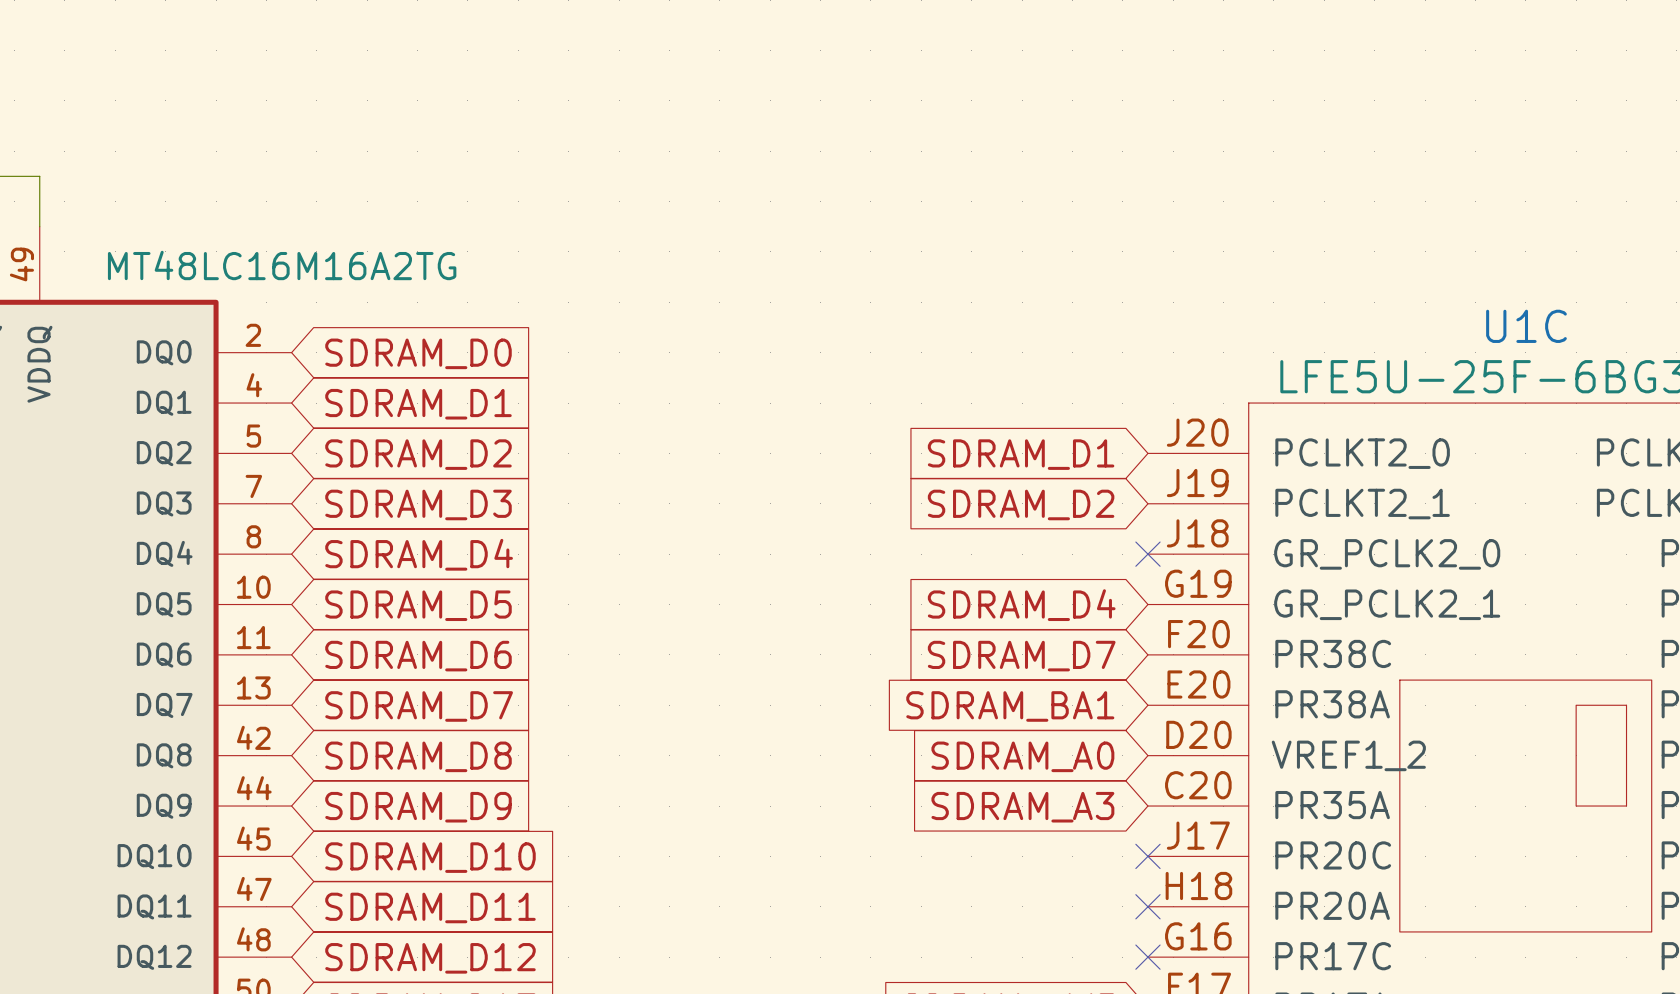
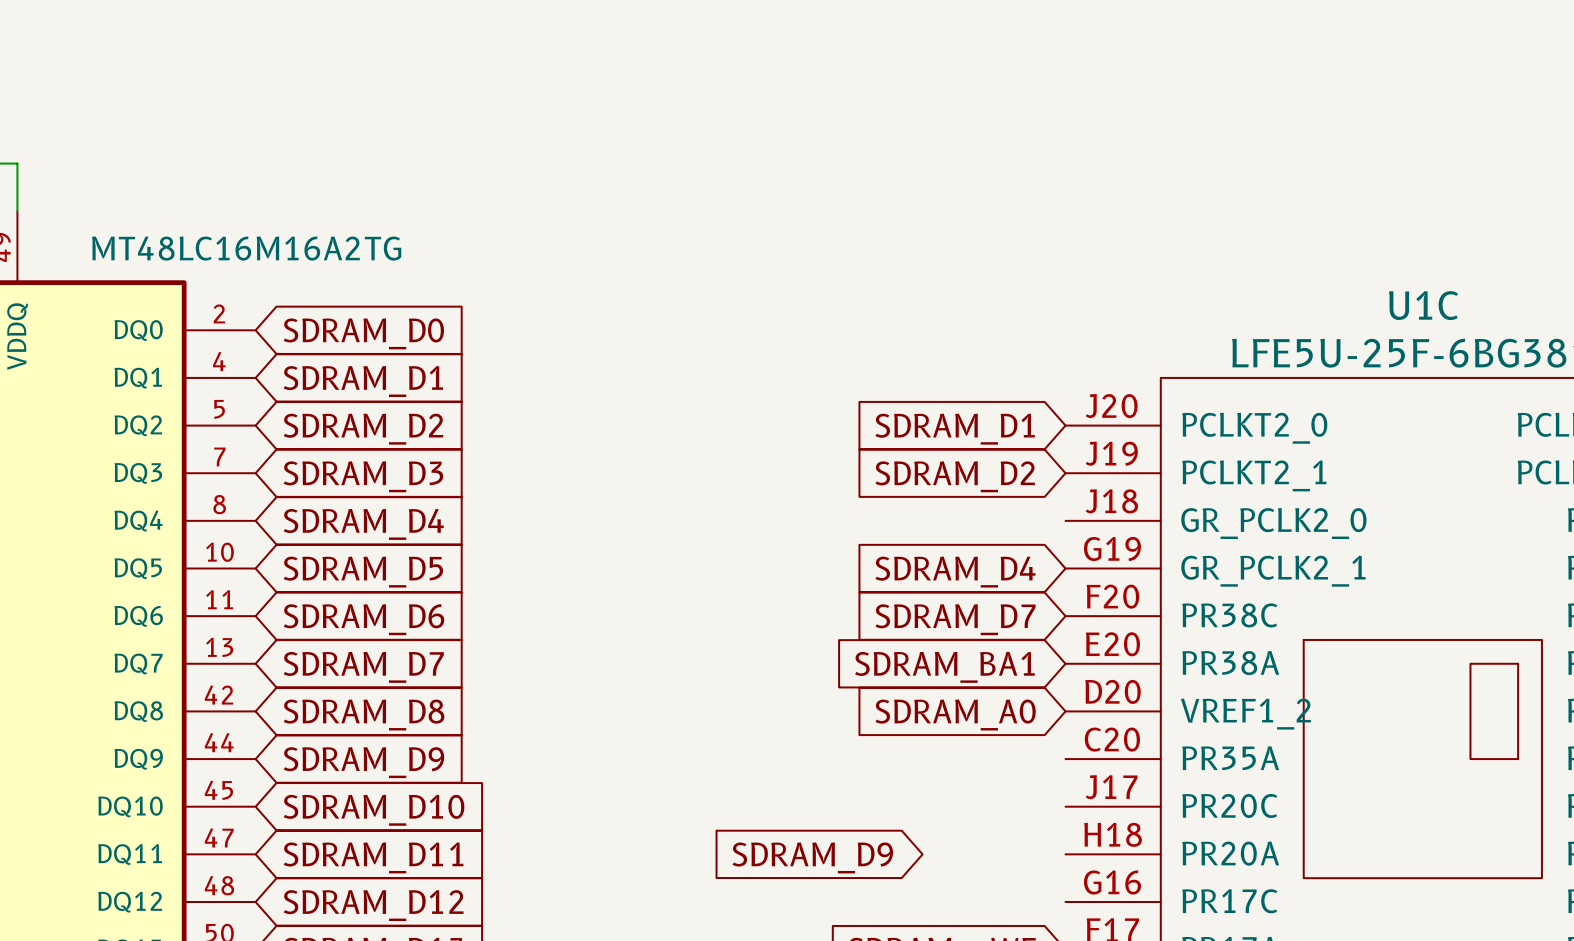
no-connect mark: (1147, 554) -> none
global label: SDRAM_A3 (1022, 807) -> none
no-connect mark: (1147, 856) -> none
no-connect mark: (1147, 906) -> none
global label: none -> SDRAM_D9 (812, 857)
no-connect mark: (1147, 957) -> none

